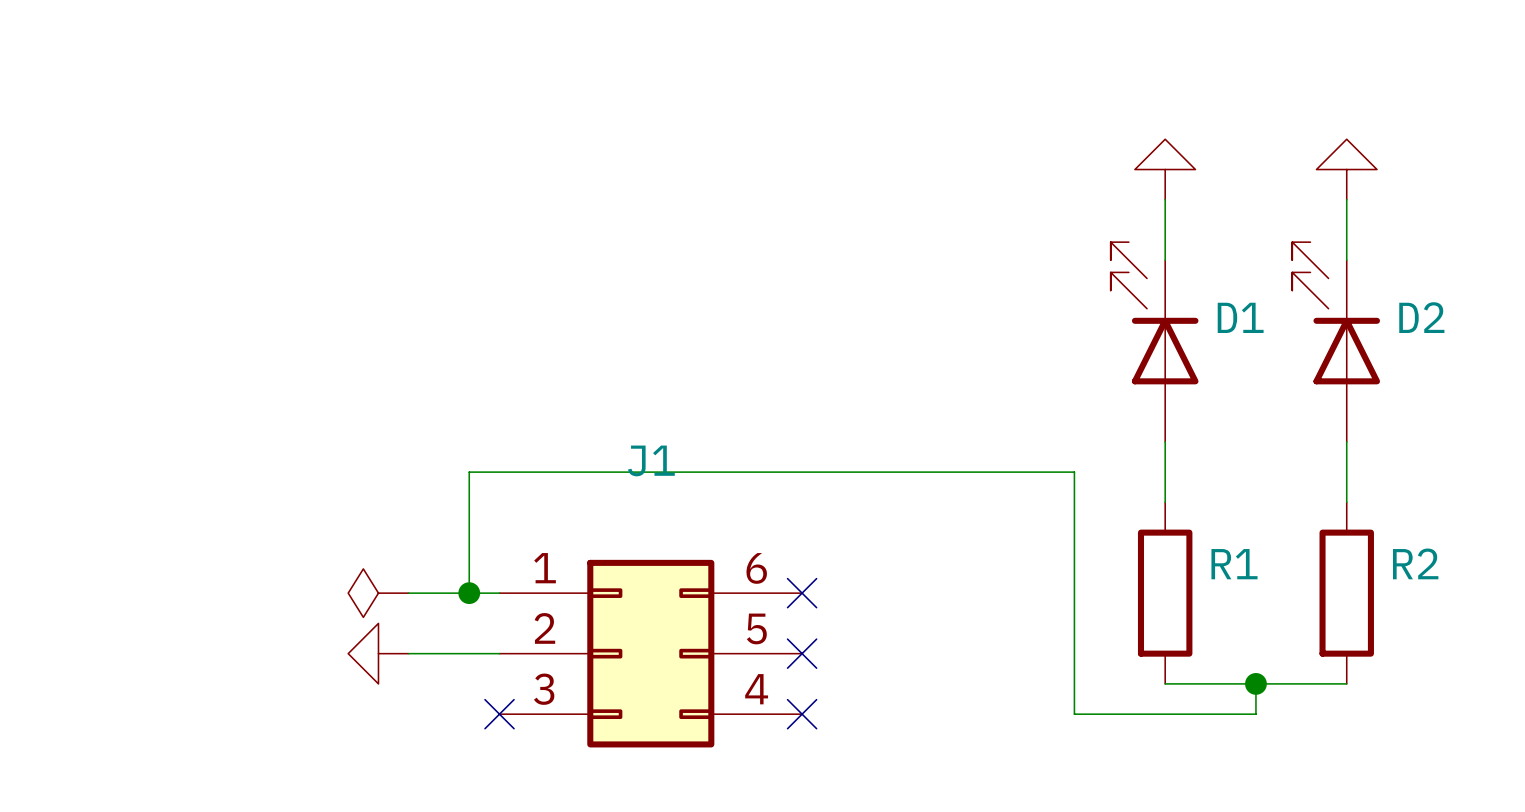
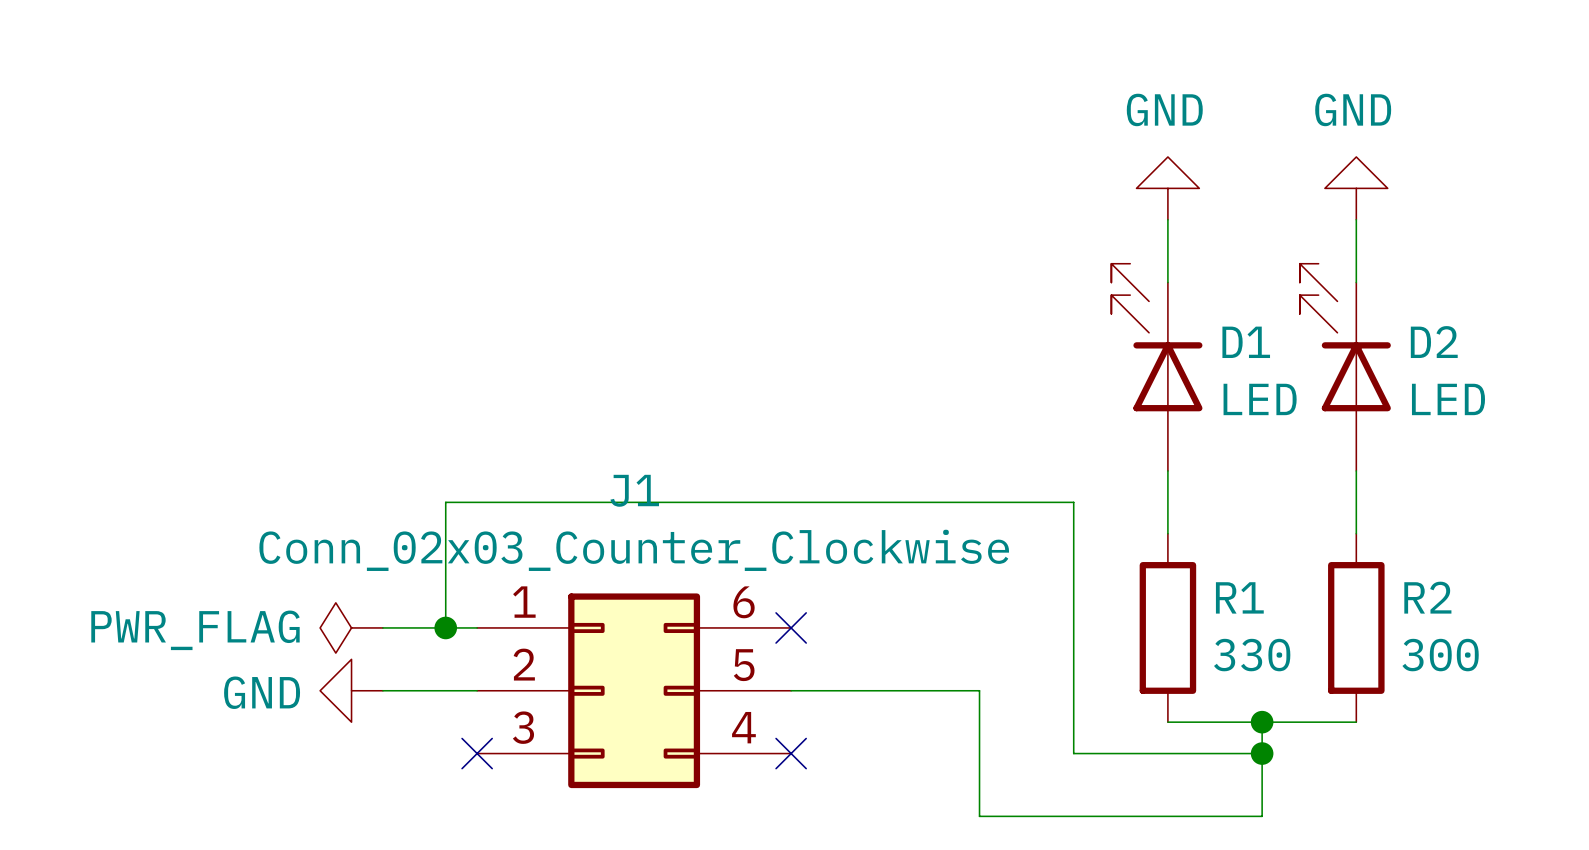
power symbol text: none -> GND (1164, 109)
power symbol text: none -> GND (1353, 109)
D1 value: none -> LED (1260, 399)
D2 value: none -> LED (1448, 399)
J1 value: none -> Conn_02x03_Counter_Clockwise (634, 550)
power symbol text: none -> PWR_FLAG (195, 630)
R1 value: none -> 330 (1252, 655)
R2 value: none -> 300 (1440, 655)
wire: none -> (791, 690) (979, 690) (979, 816) (1262, 816) (1262, 753)
no-connect mark: (802, 653) -> none
power symbol text: none -> GND (262, 692)
junction: none -> (1262, 753)

